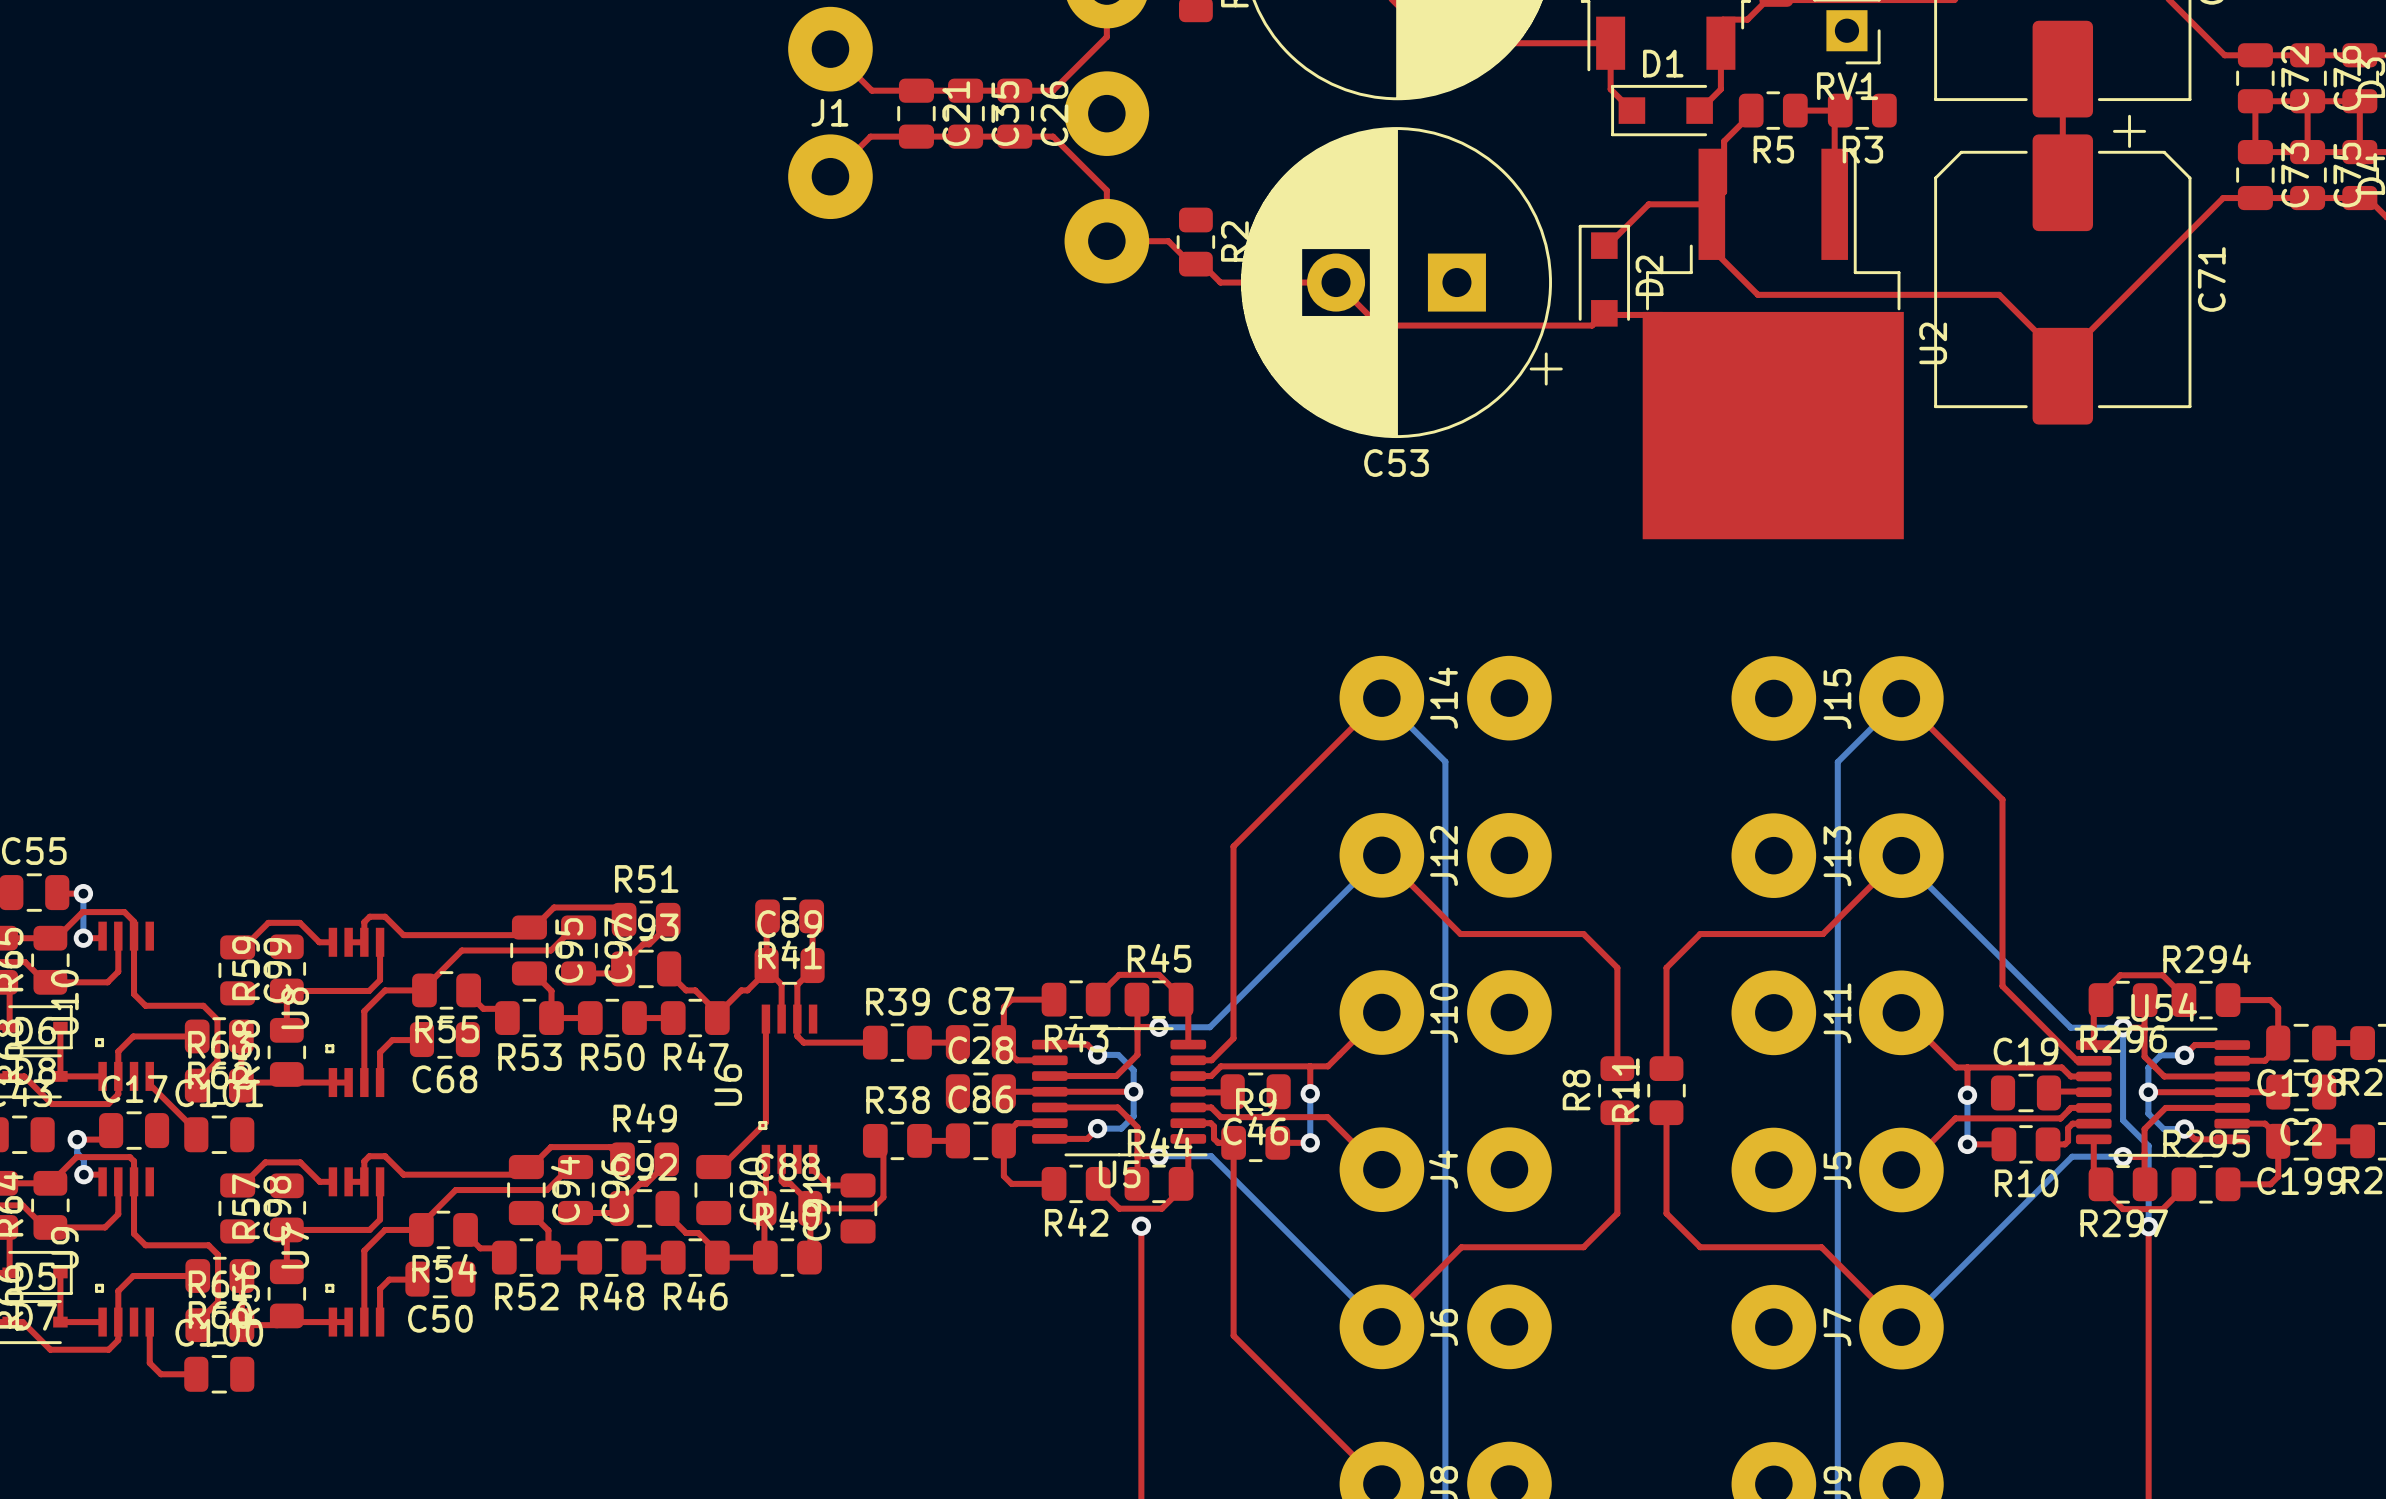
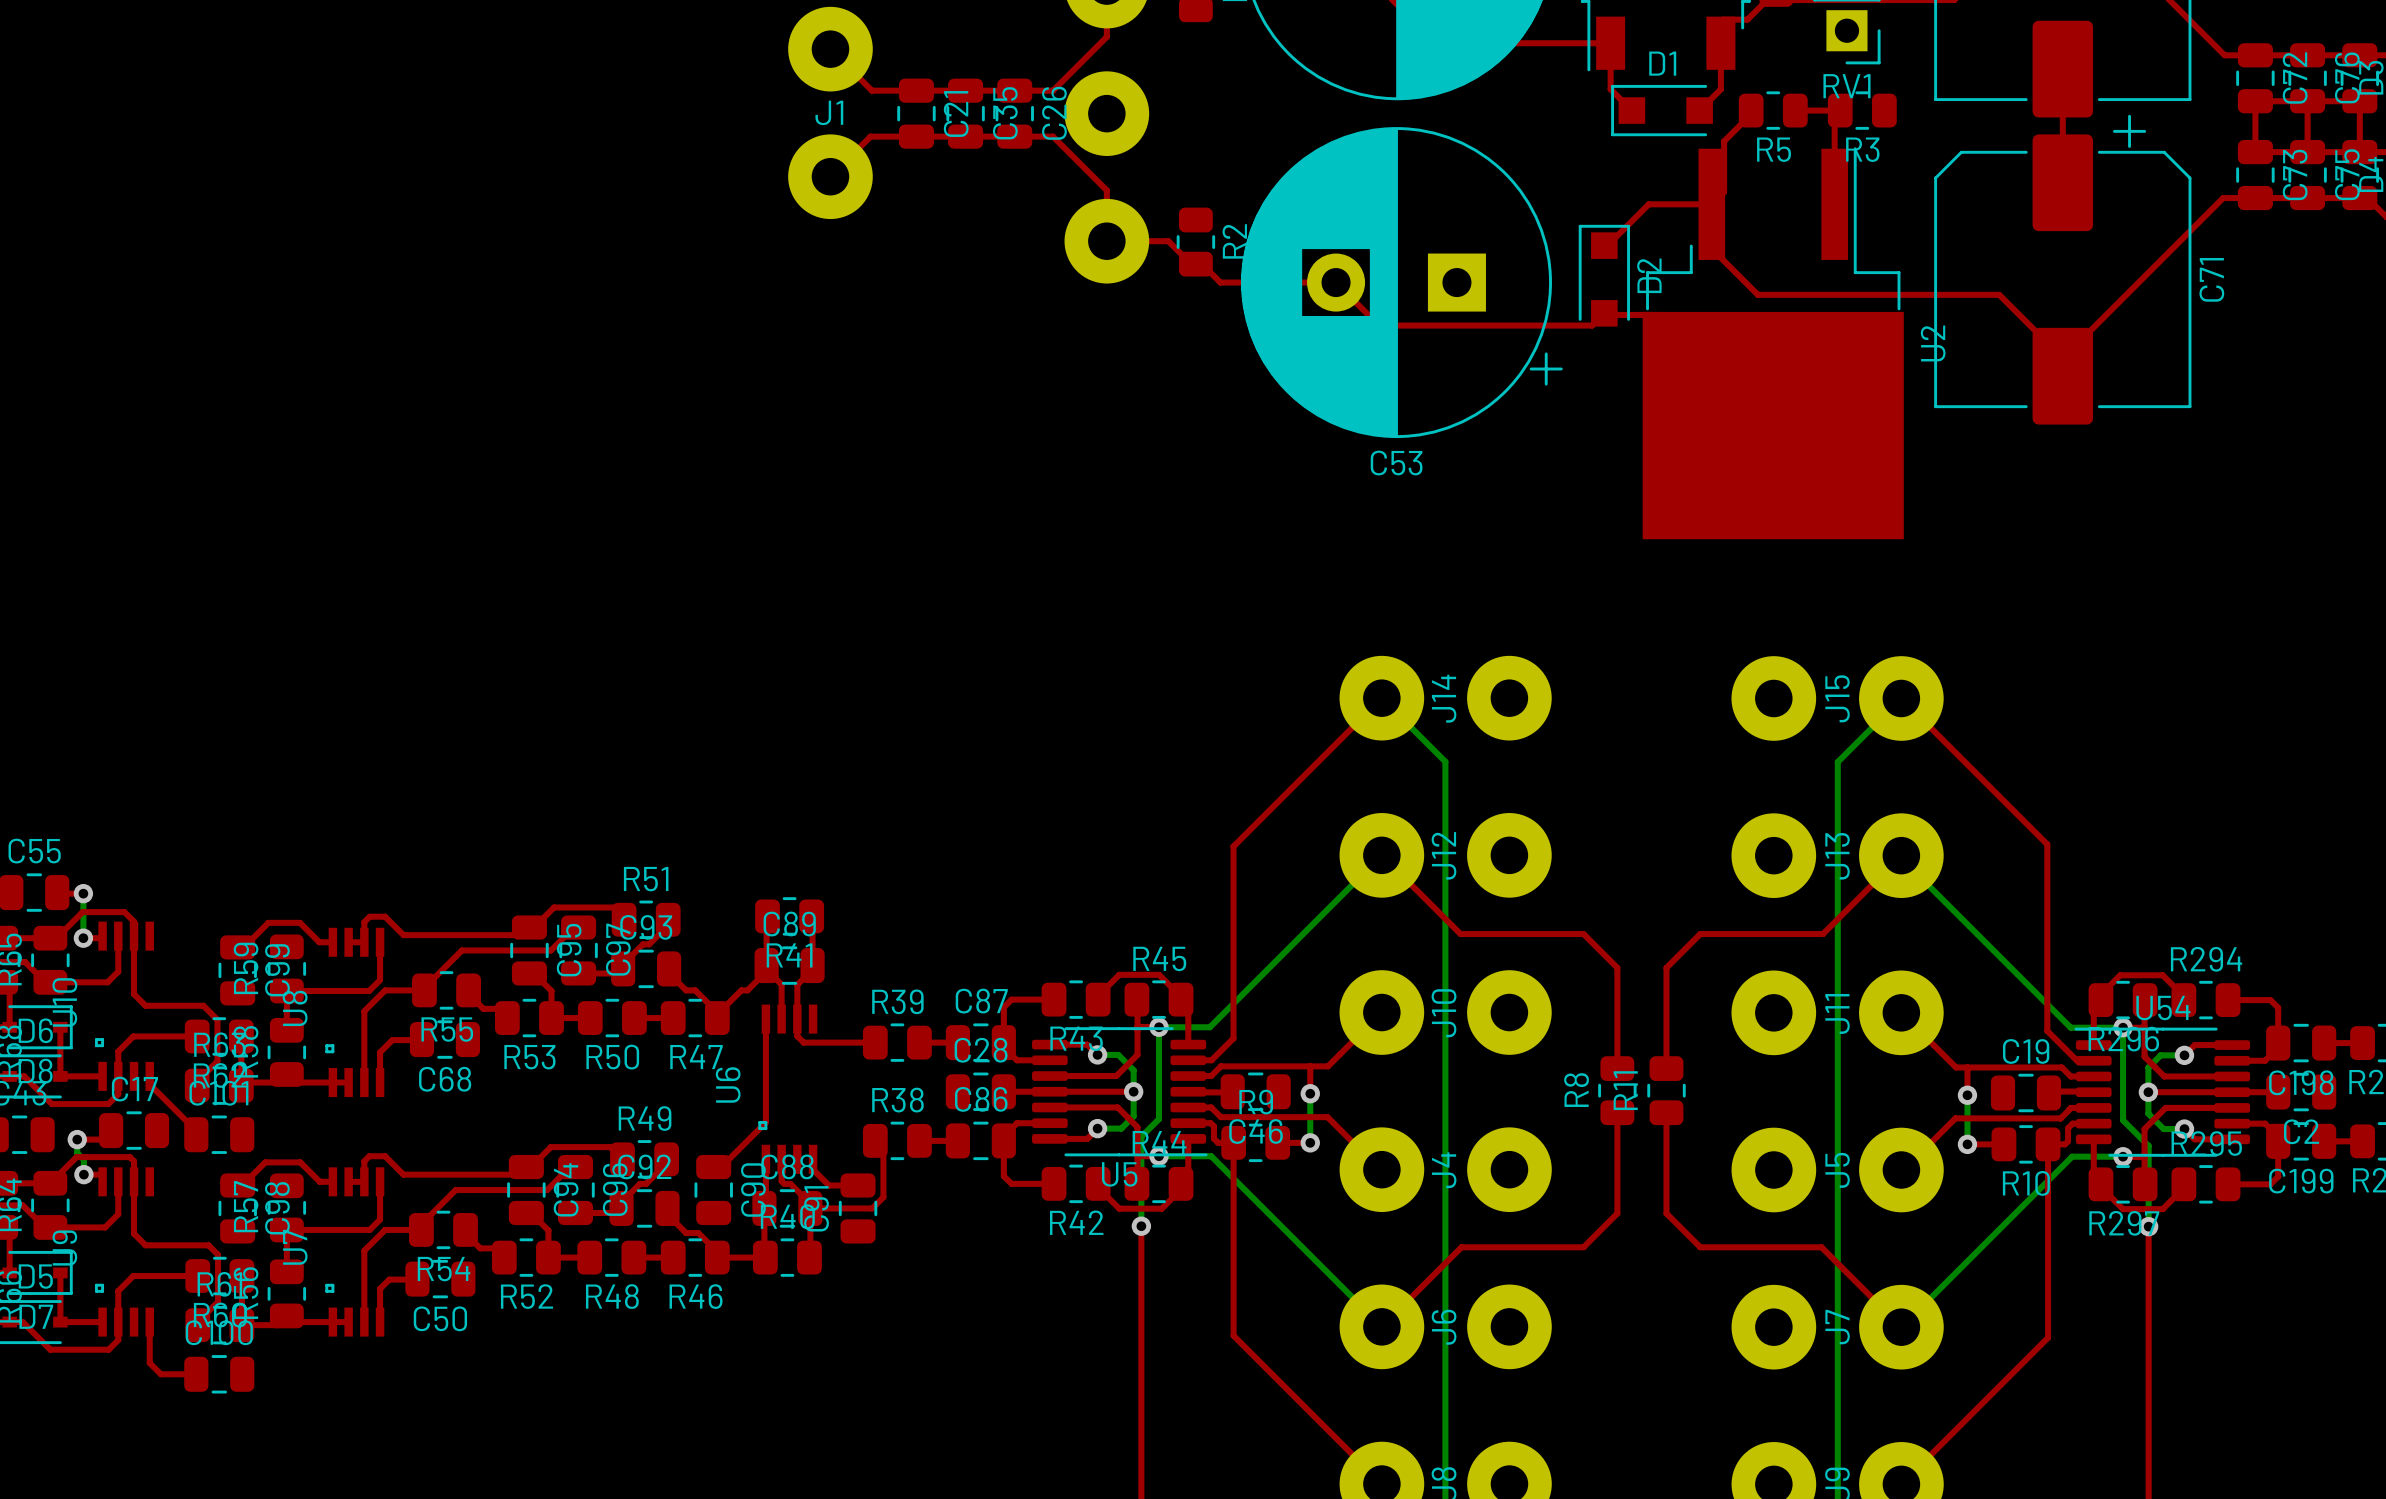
top track: (2002, 799) (2002, 986) (2047, 1030) -> (2002, 799) (2047, 844) (2047, 1030)
bottom track: none -> (1159, 1027) (1159, 1119) (1141, 1136) (1141, 1226)
top track: none -> (2048, 1144) (2048, 1337) (1901, 1484)

